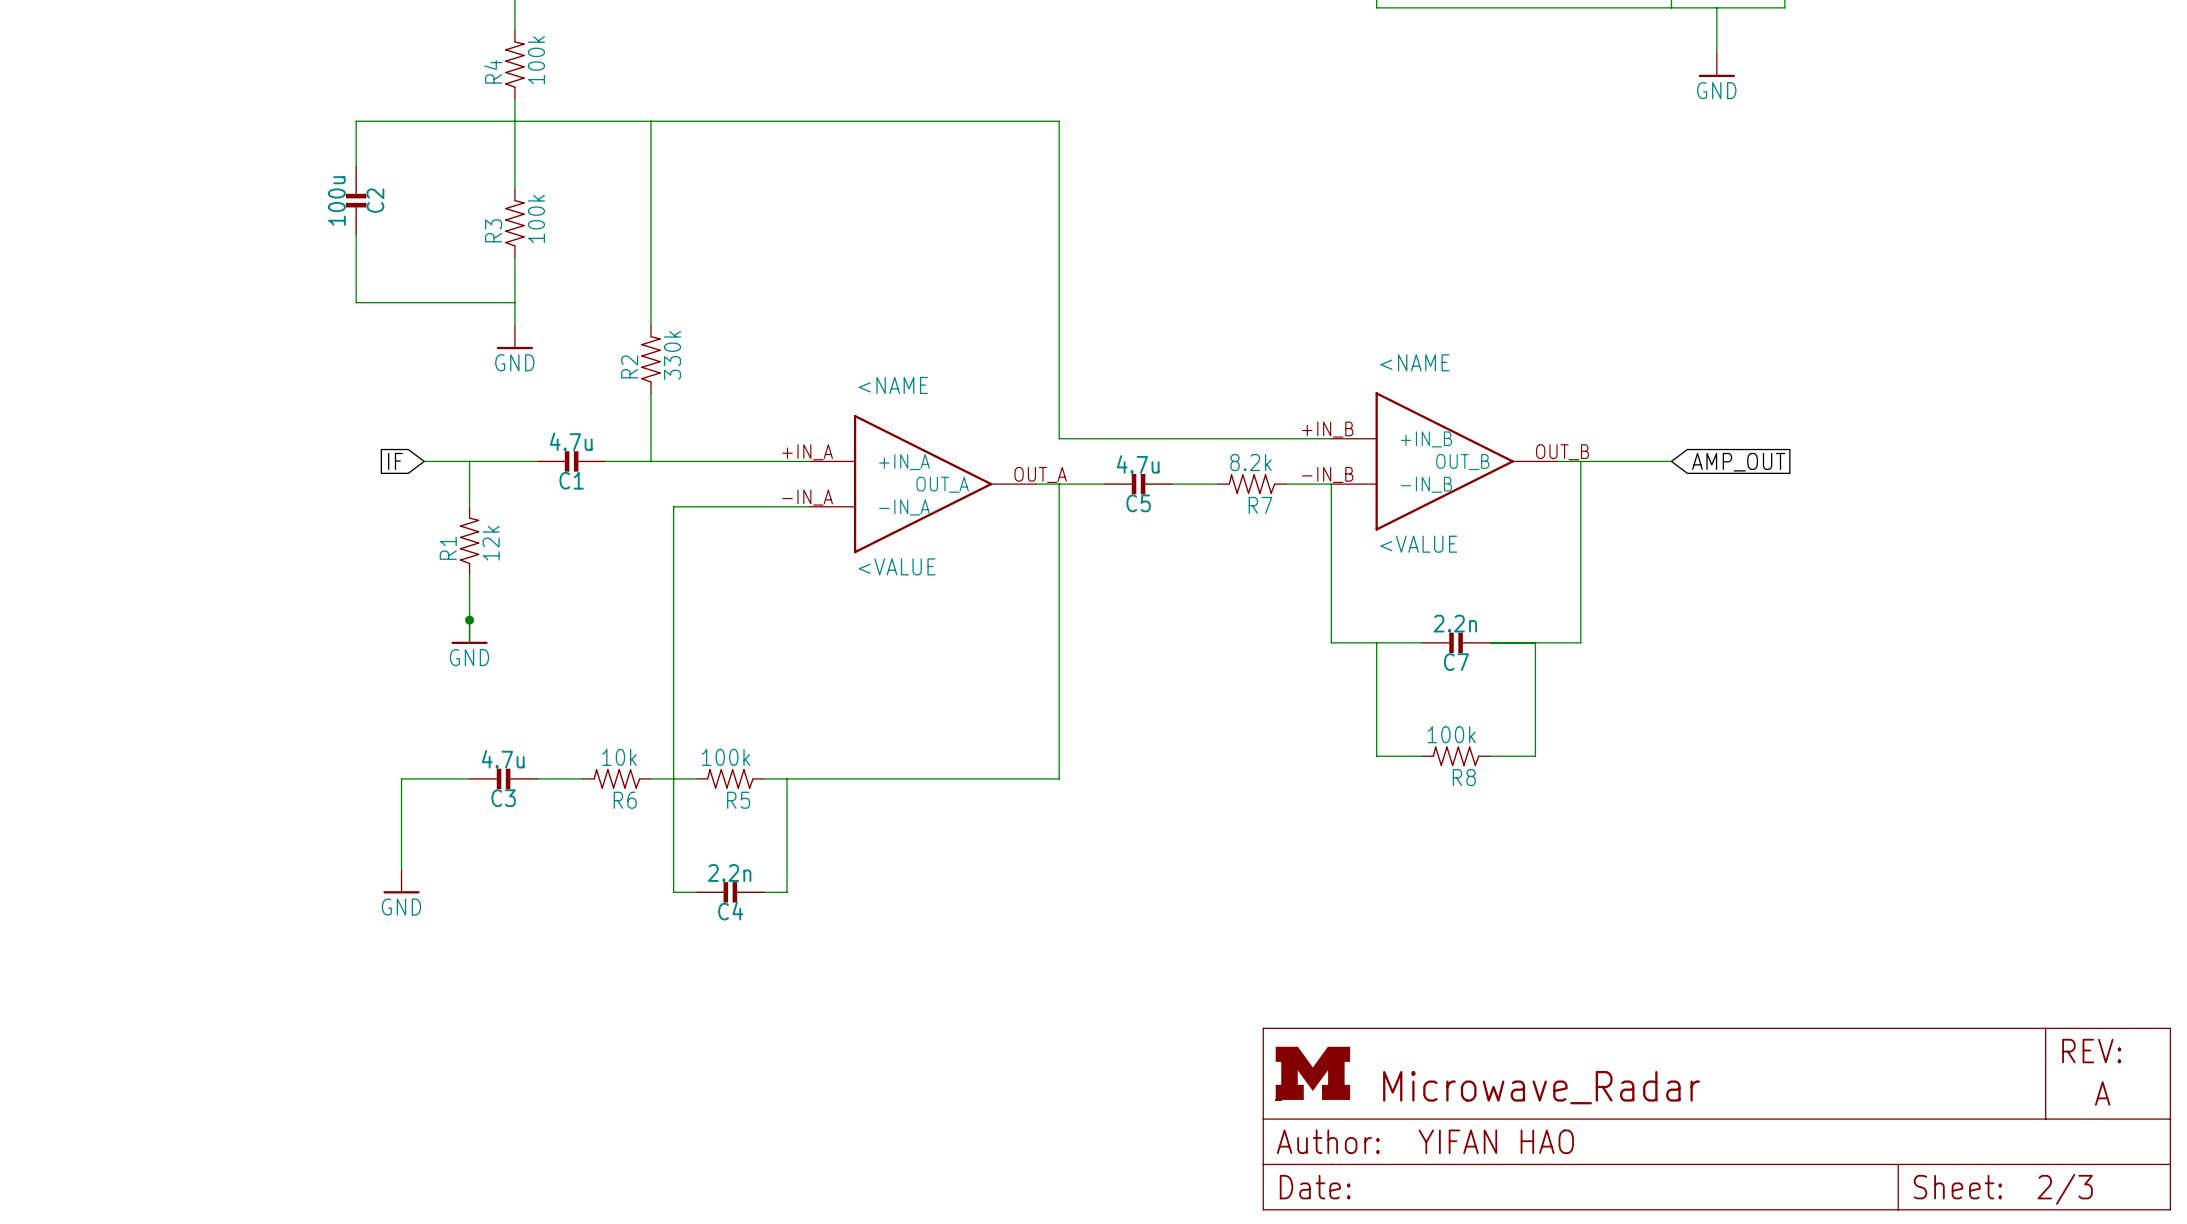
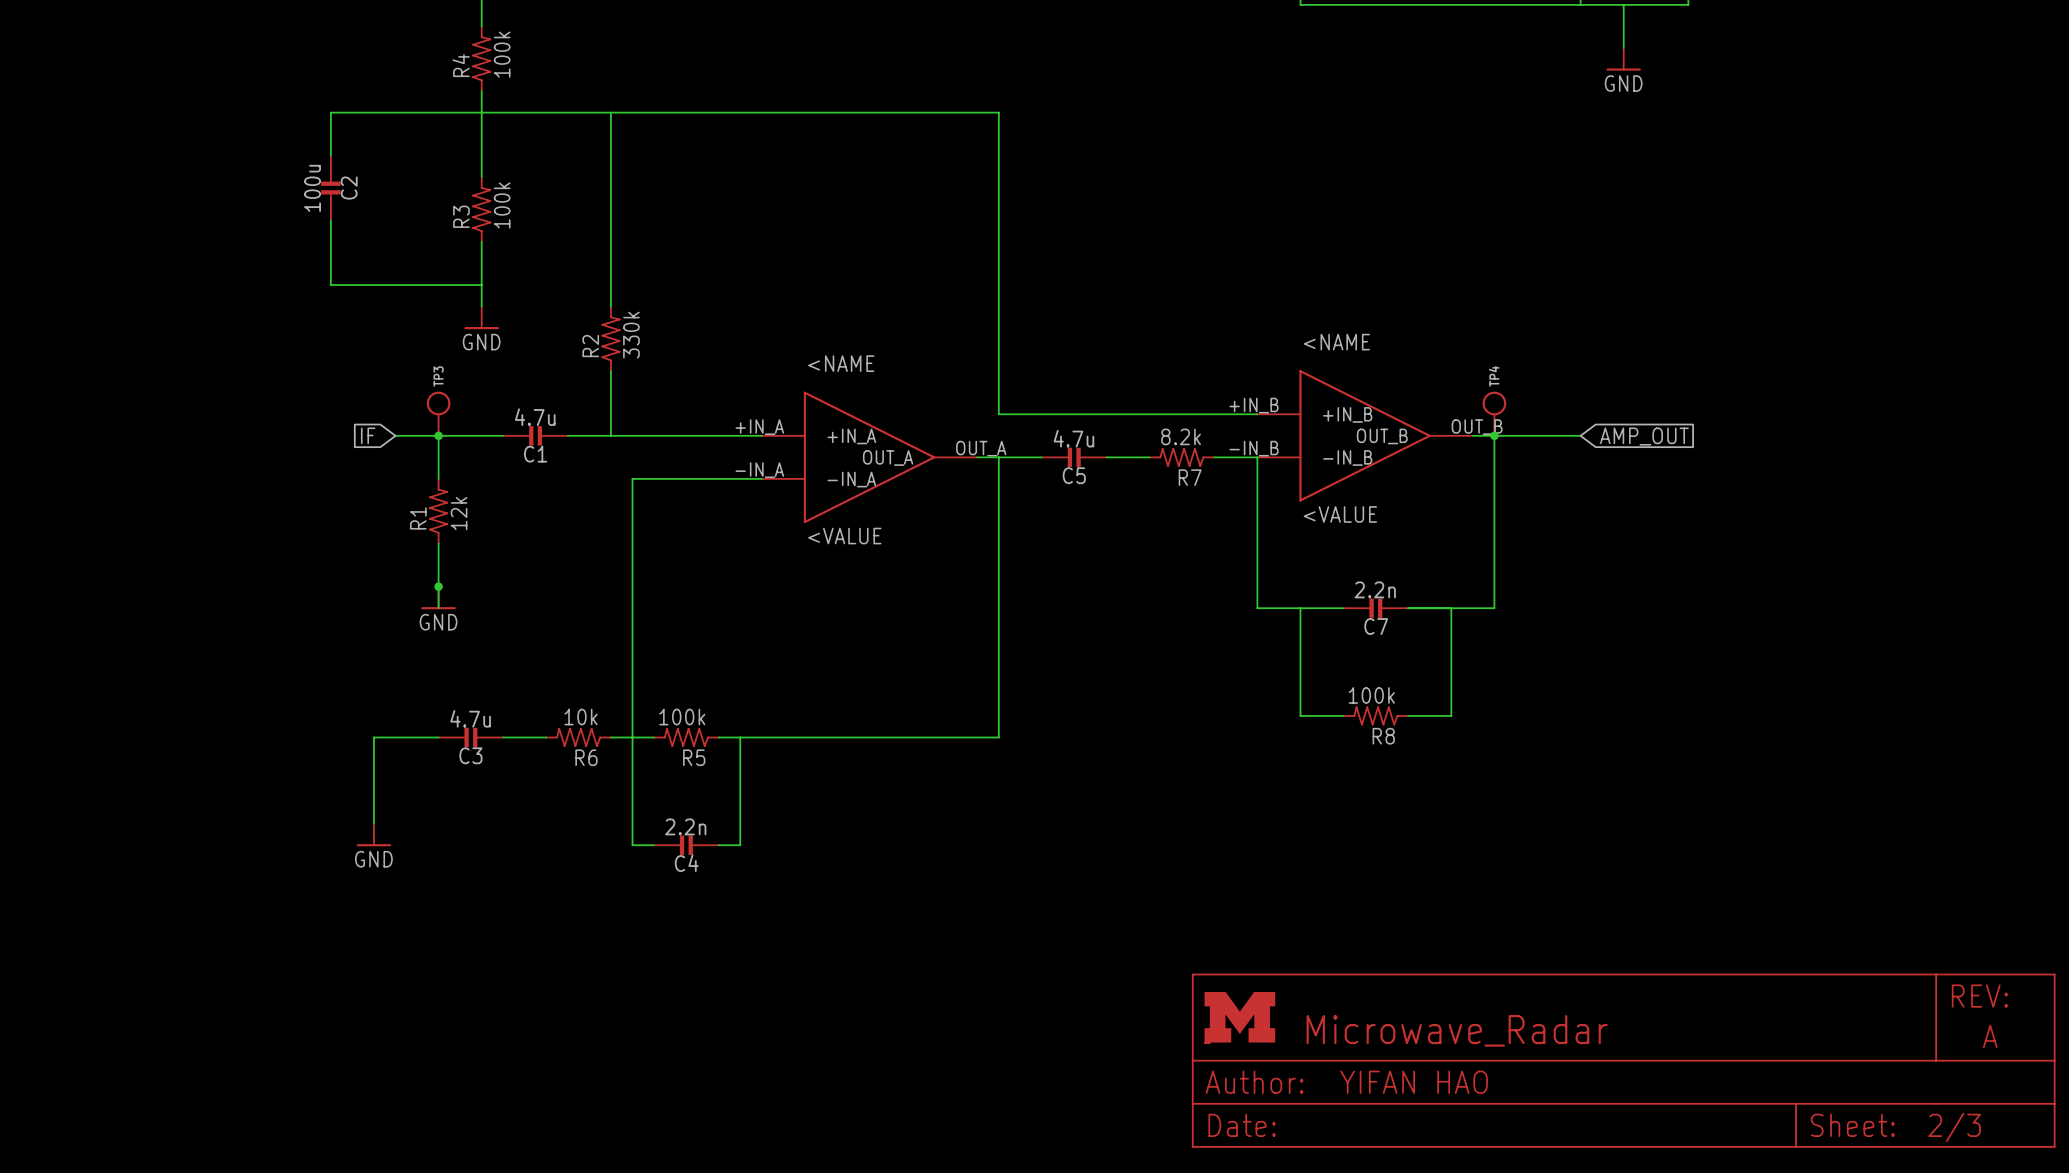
TP3: none -> (438, 413)
TP4: none -> (1494, 413)
junction: none -> (438, 435)
junction: none -> (1494, 435)

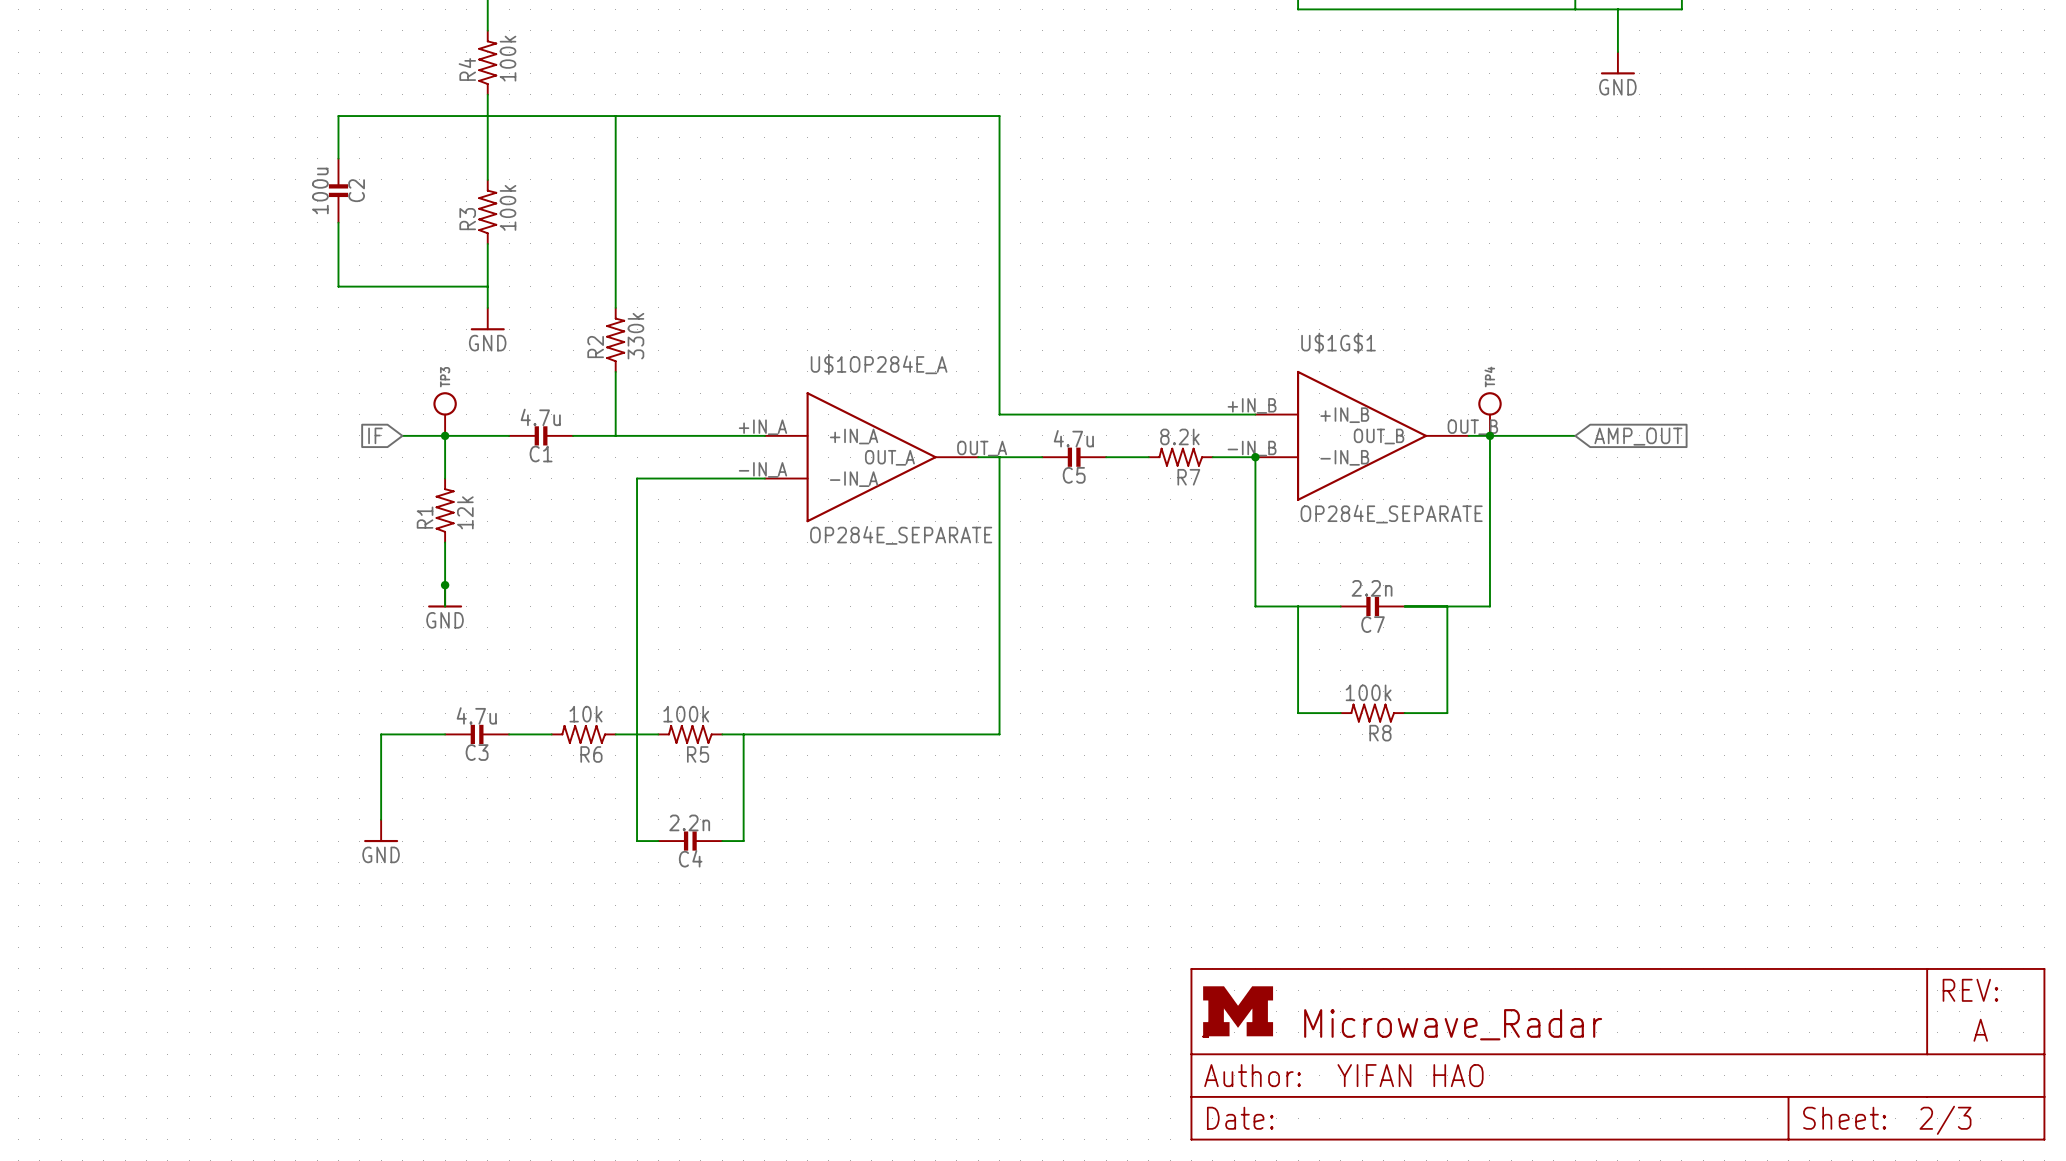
U$1G$1 text: <NAME (1336, 342) -> none
U$1G$1 name: none -> U$1G$1 (1338, 343)
U$1OP284E_A text: <NAME (841, 363) -> none
U$1OP284E_A name: none -> U$1OP284E_A (879, 364)
junction: none -> (1255, 457)
U$1G$1 text: <VALUE (1340, 514) -> none
U$1G$1 value: none -> OP284E_SEPARATE (1391, 514)
U$1OP284E_A text: <VALUE (844, 536) -> none
U$1OP284E_A value: none -> OP284E_SEPARATE (901, 535)

